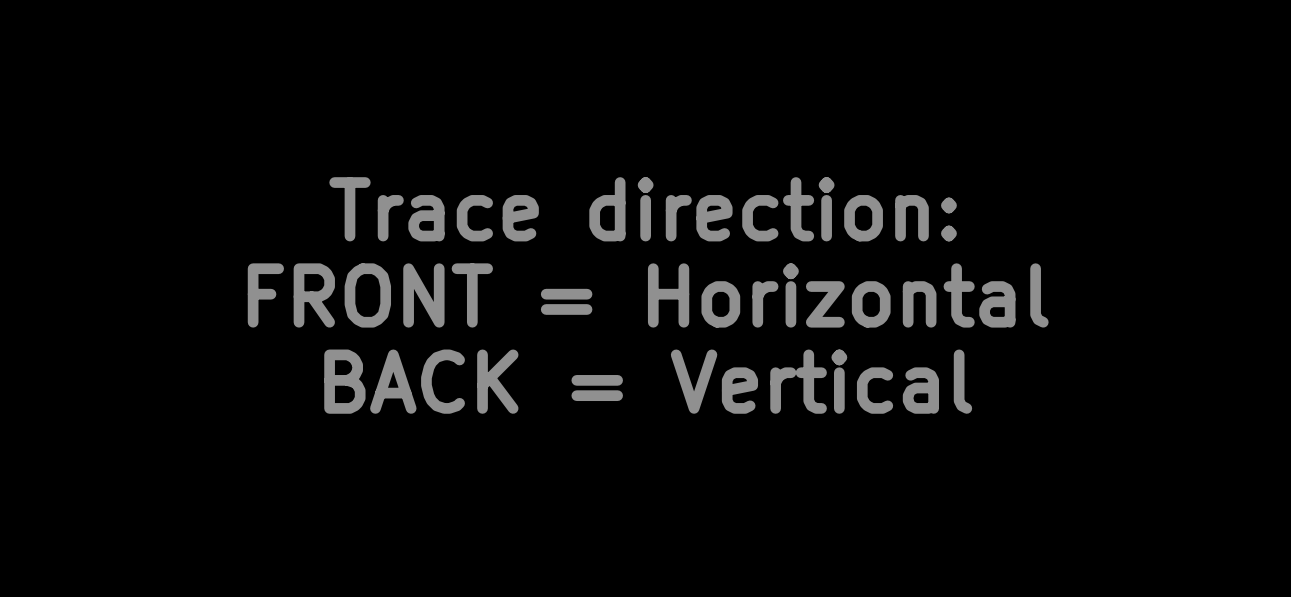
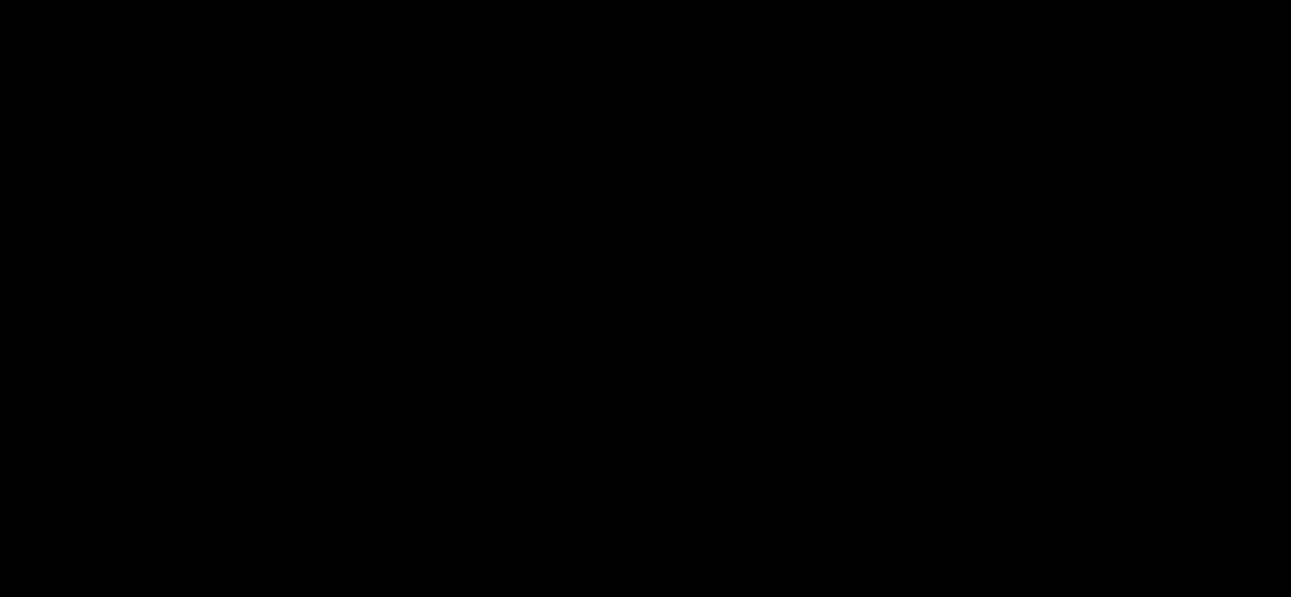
text: Trace direction: (643, 209) -> none
text: FRONT = Horizontal (648, 295) -> none
text: BACK = Vertical (648, 381) -> none

